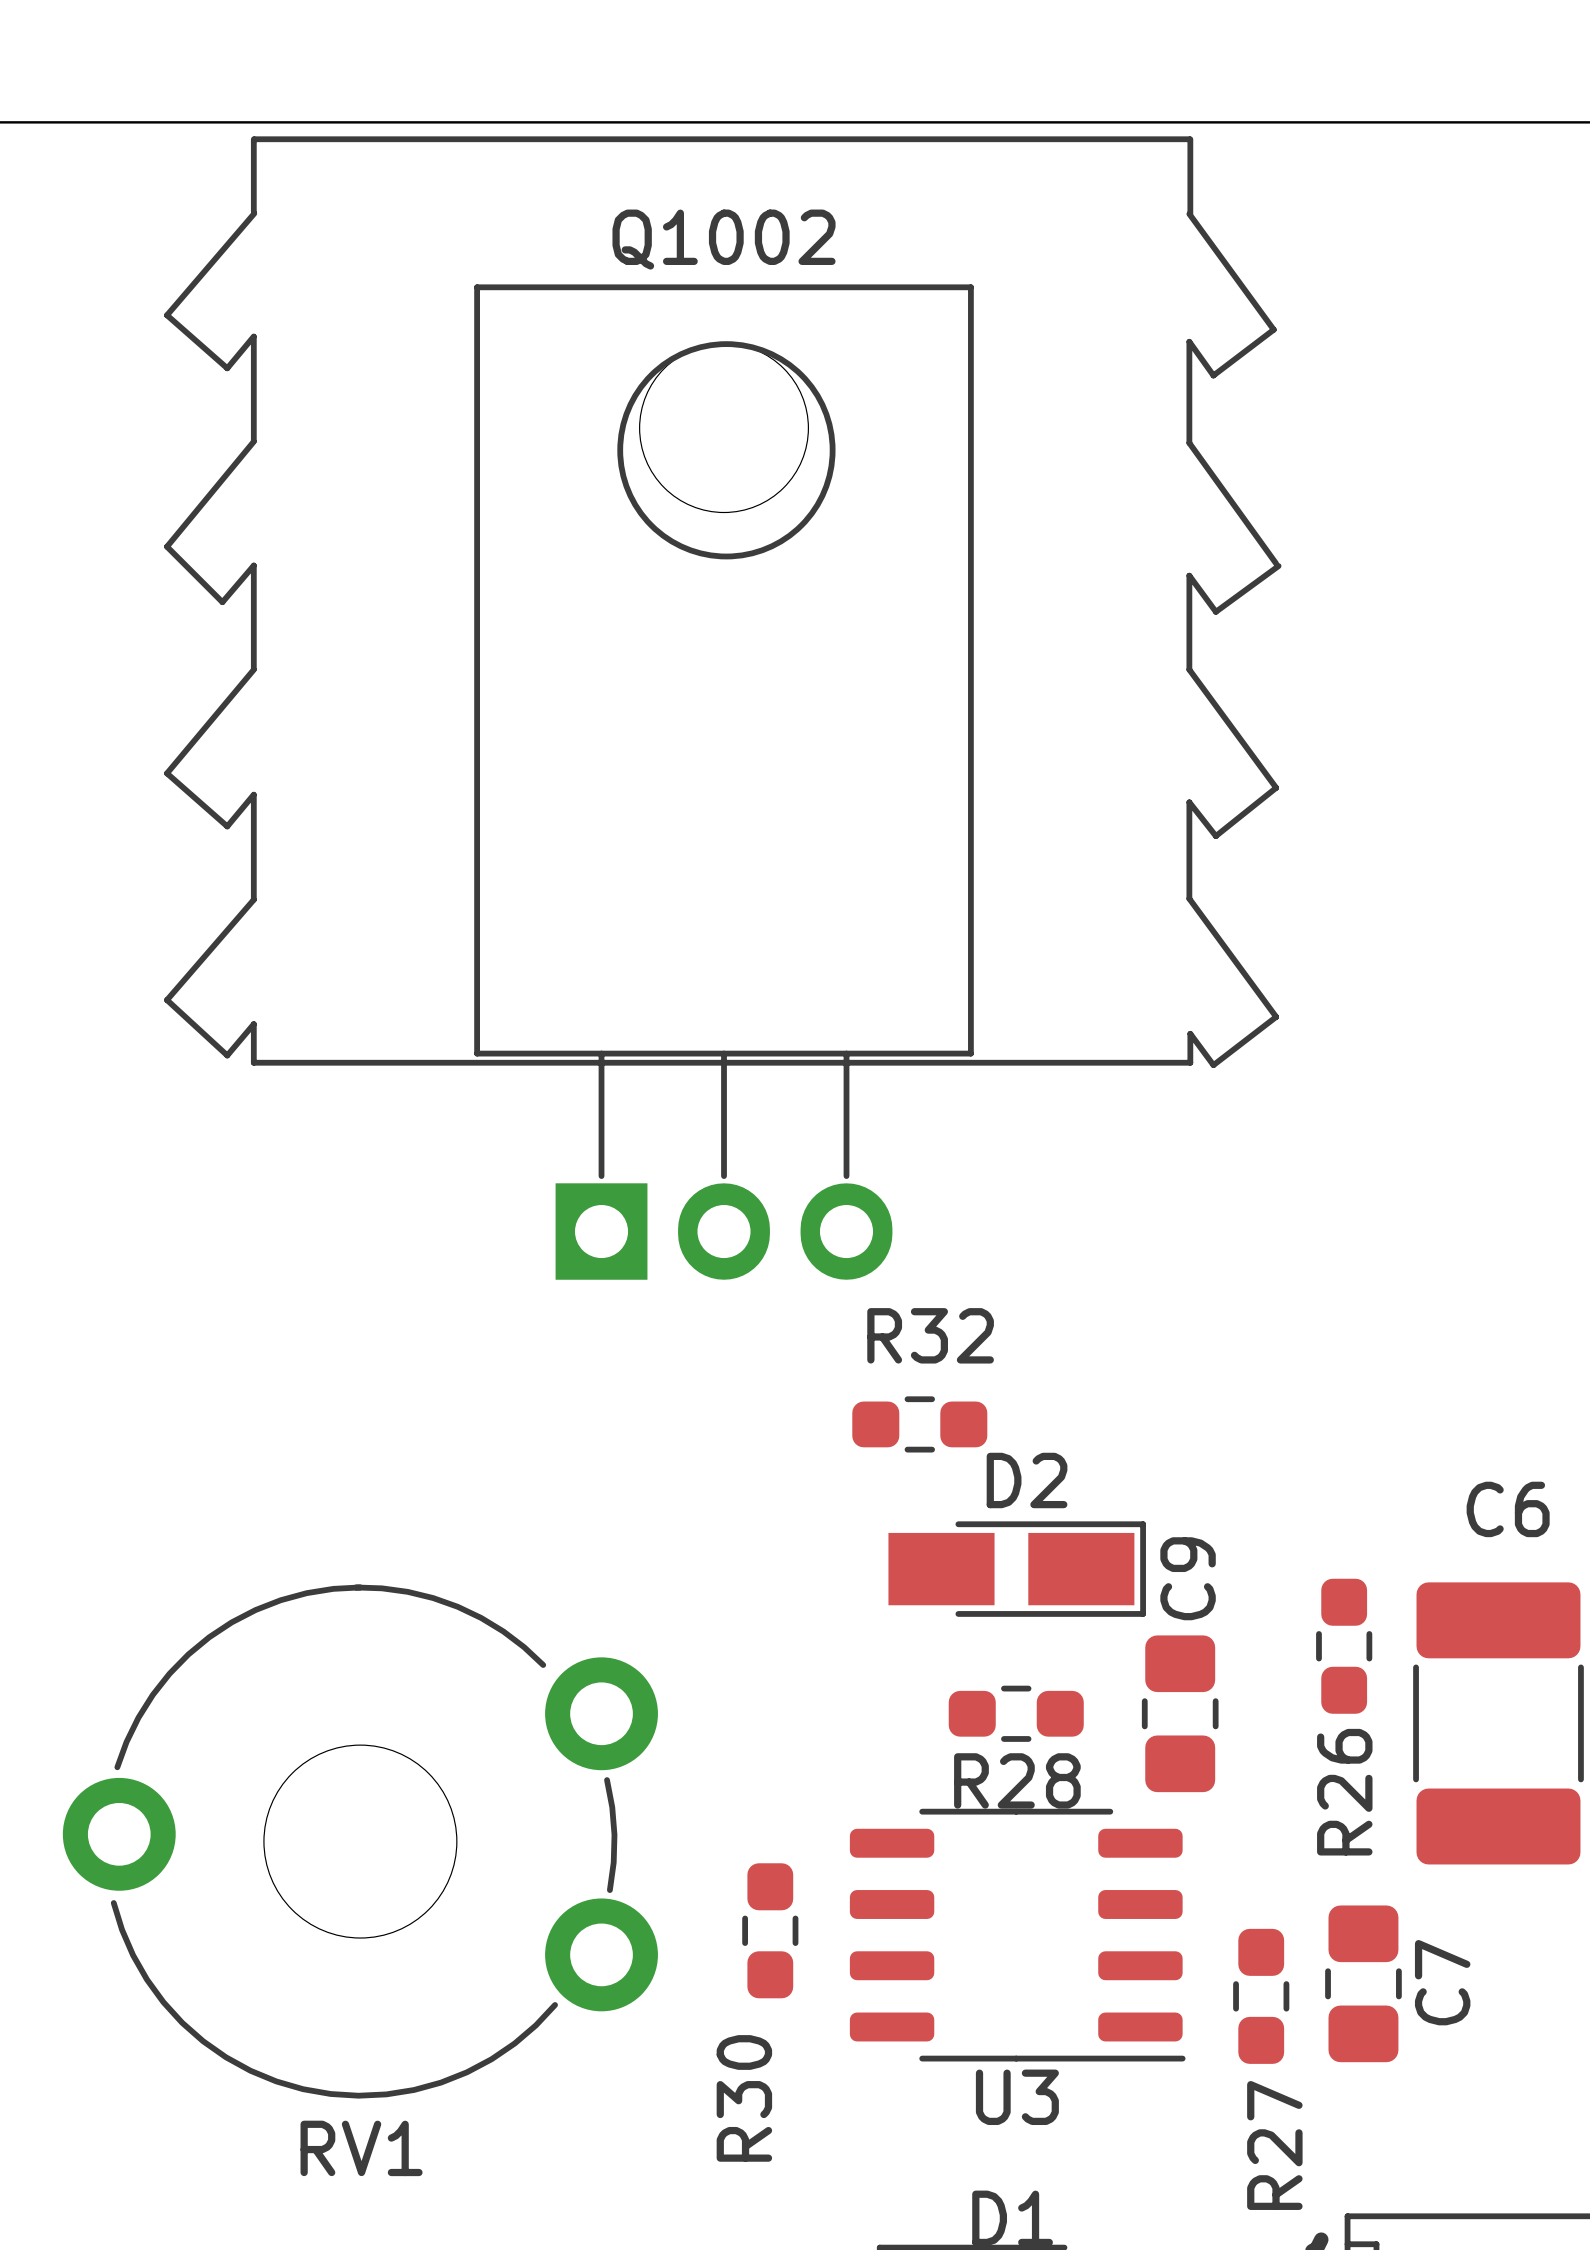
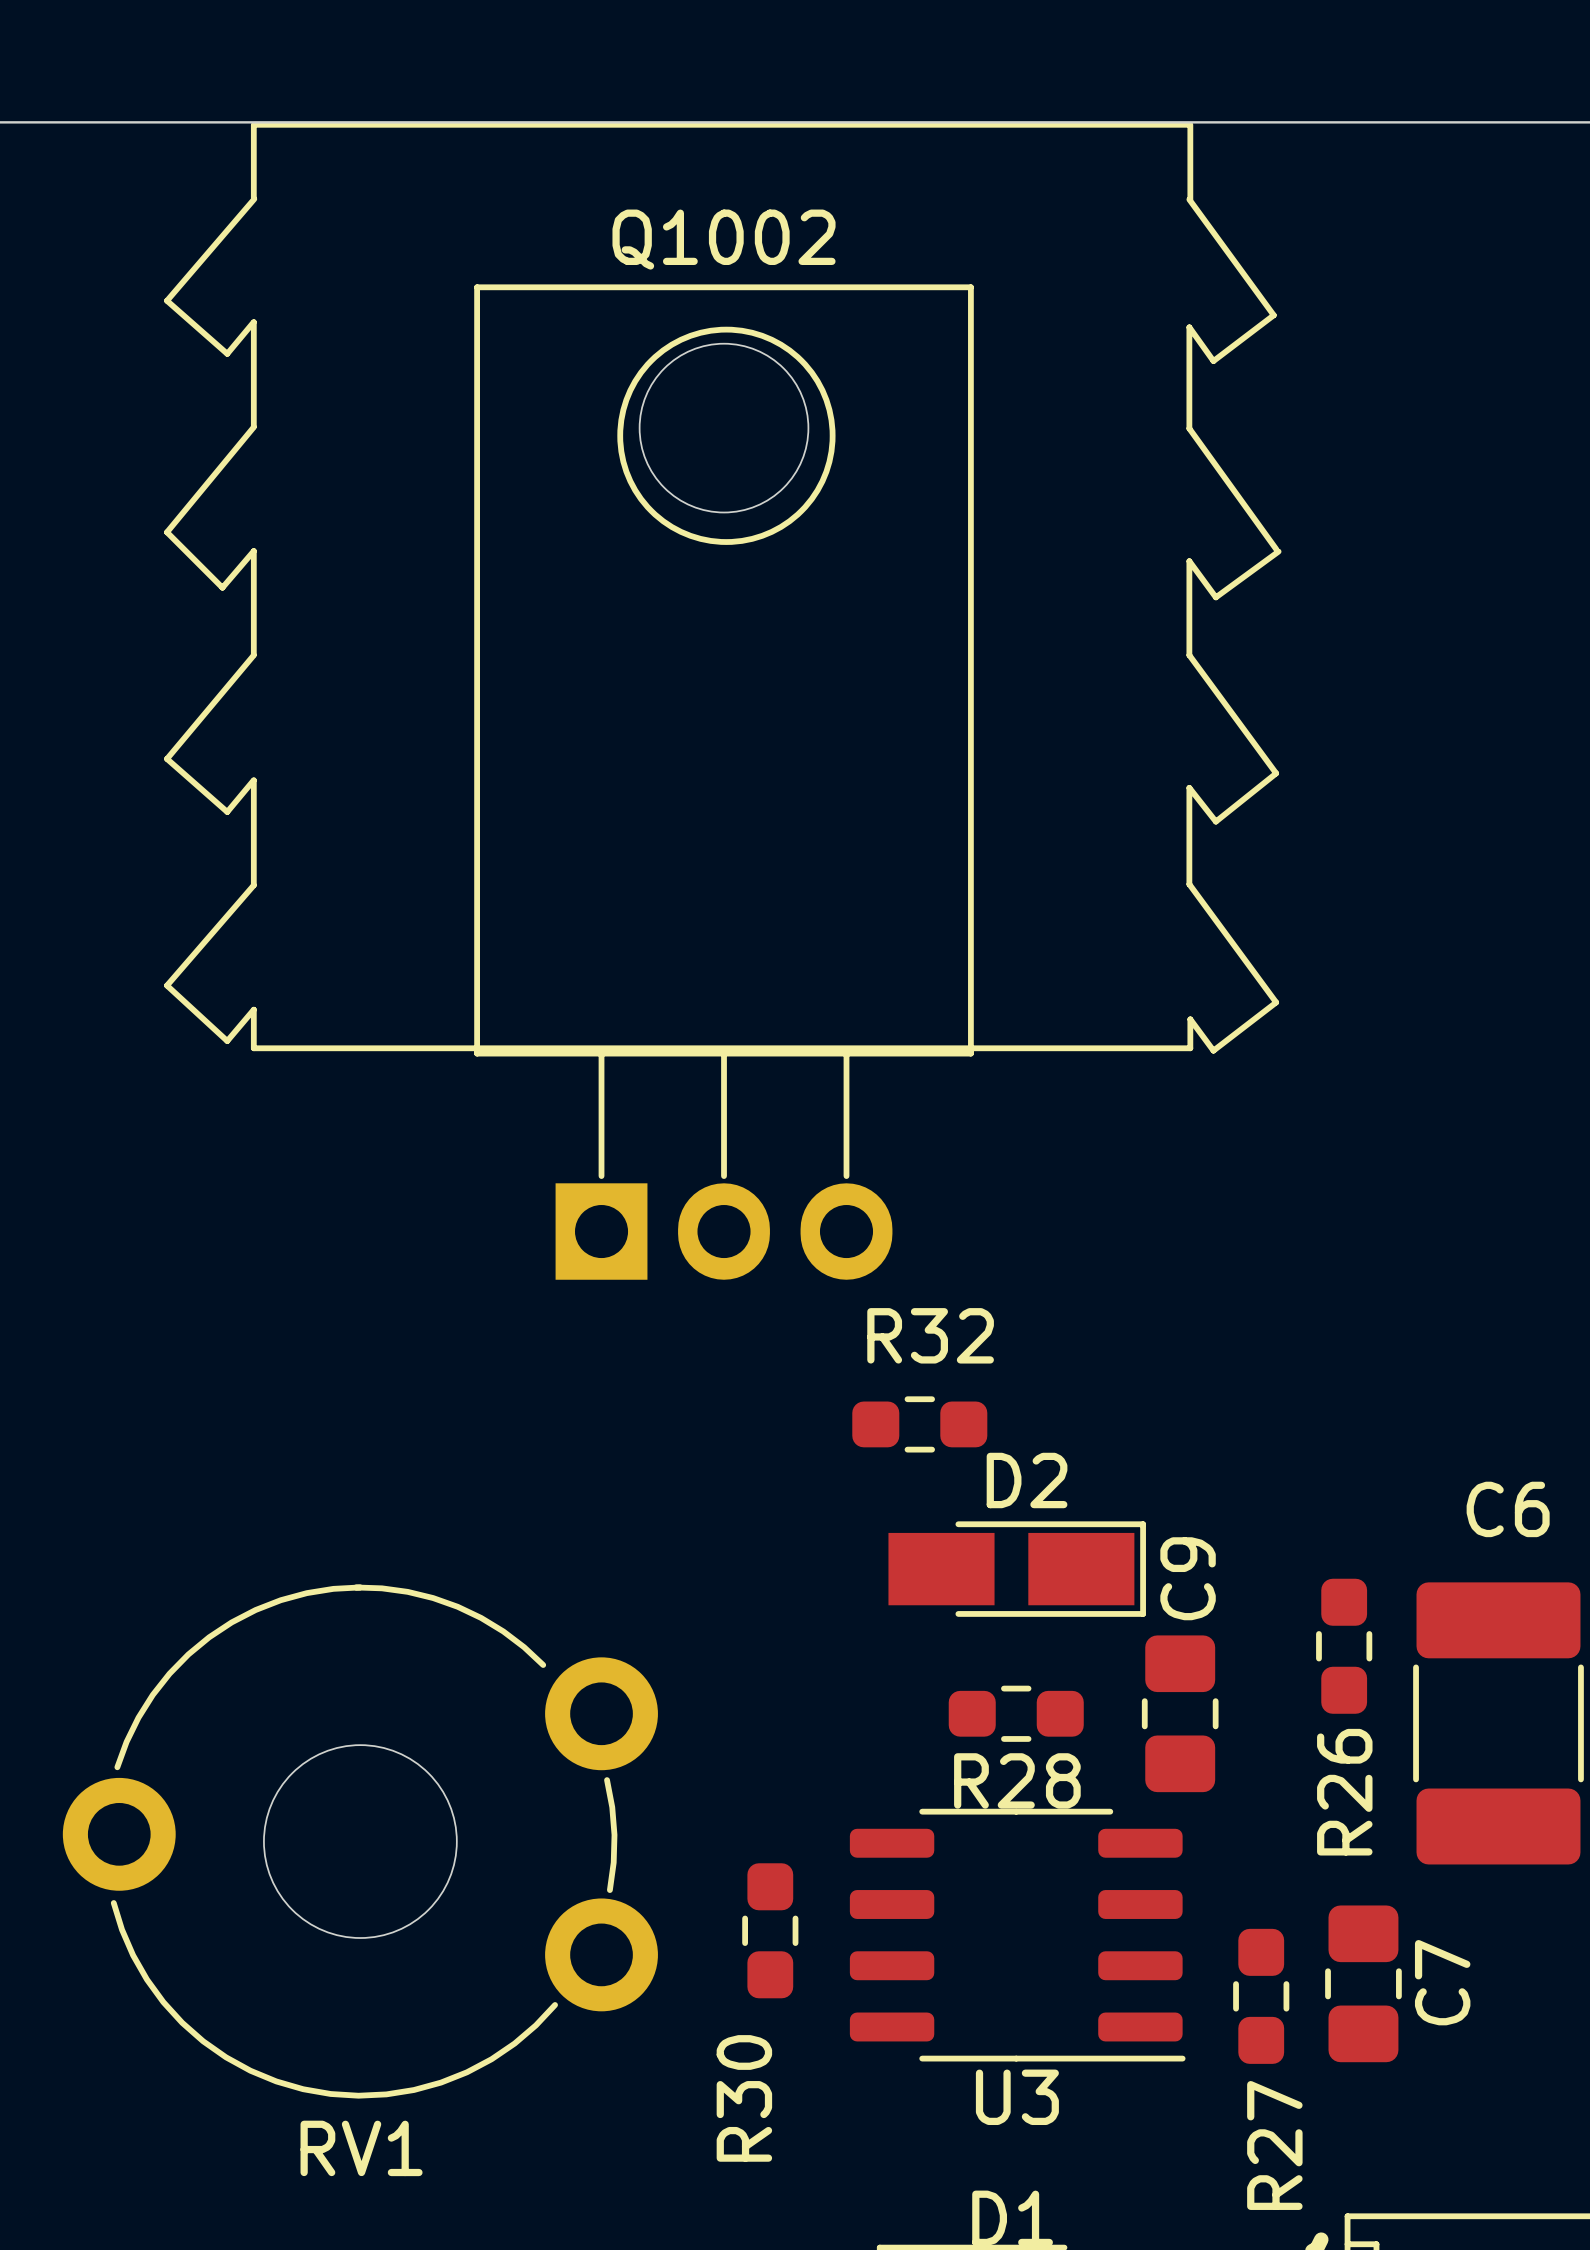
drawing position: (722, 602) -> (722, 587)

